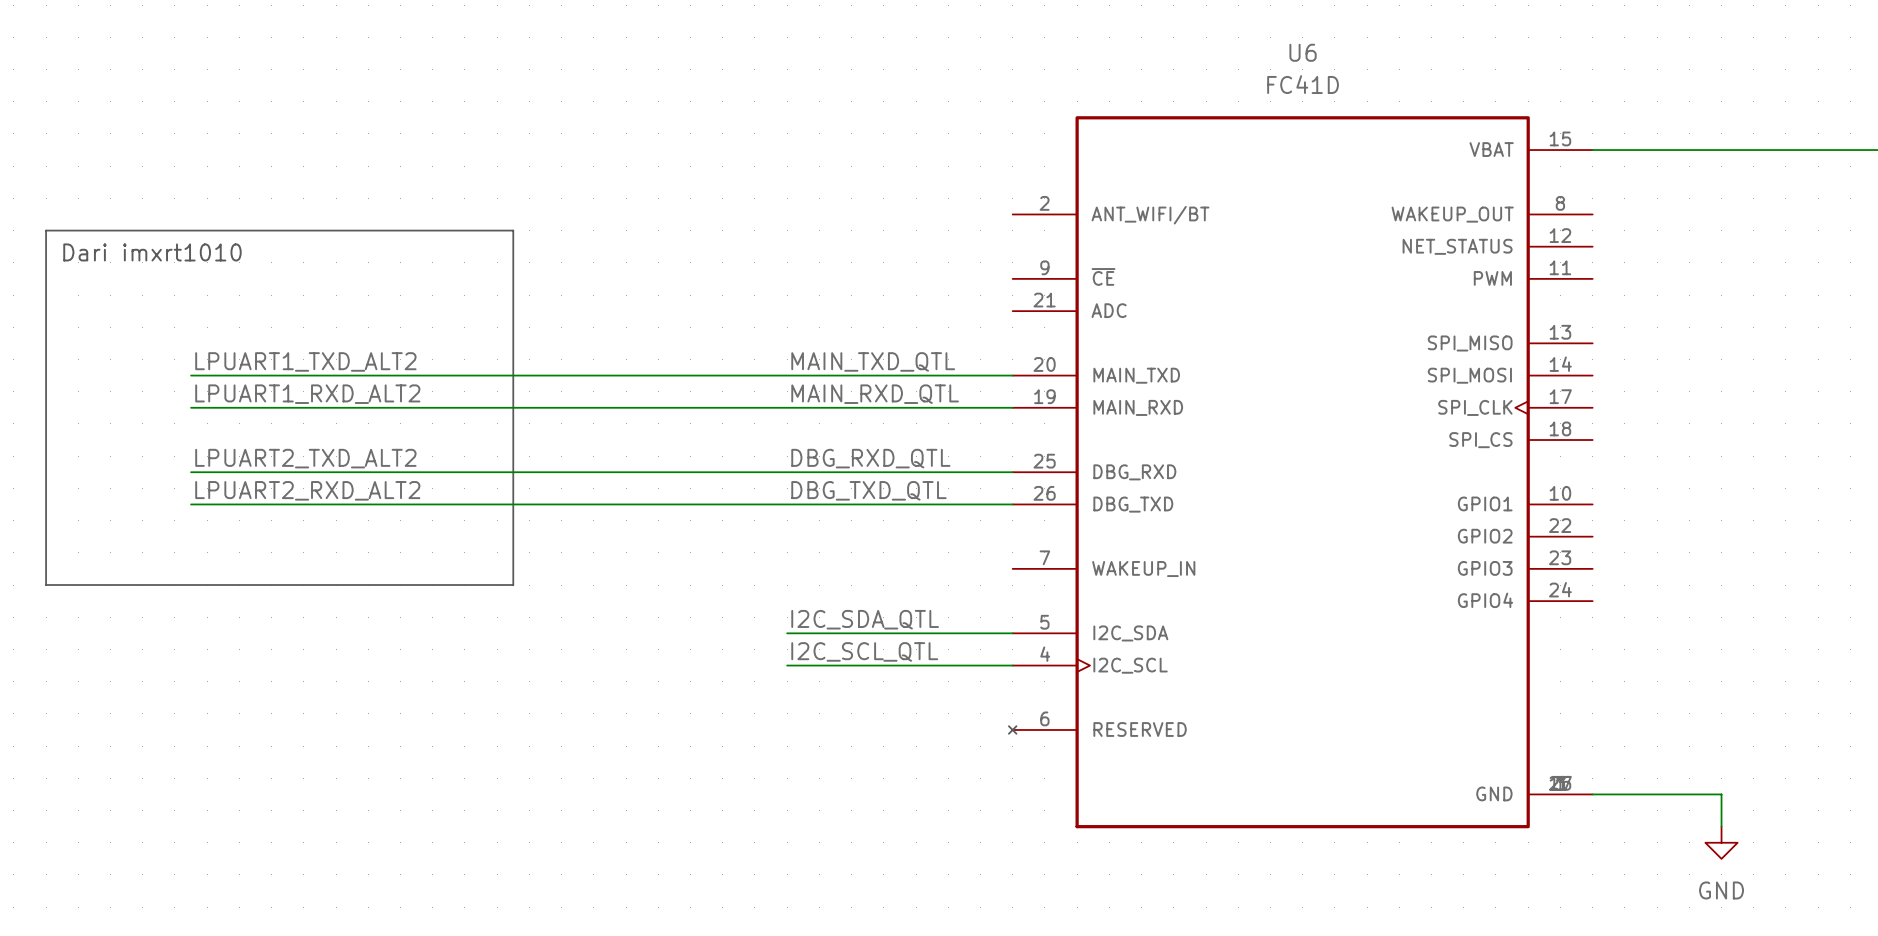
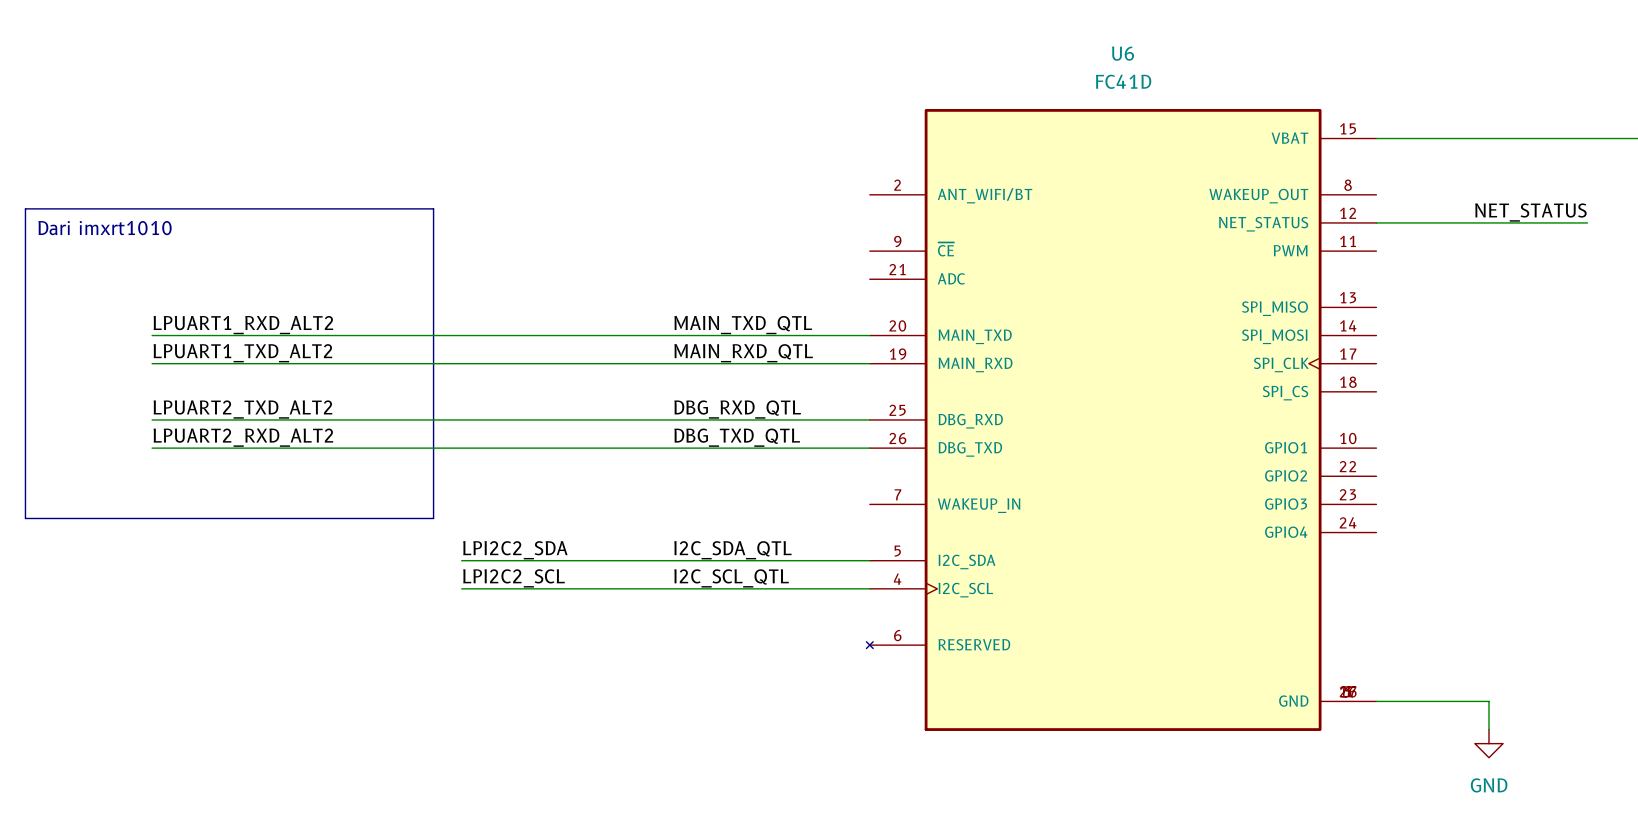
label: none -> NET_STATUS (1530, 212)
wire: none -> (1376, 222) (1587, 222)
label: LPUART1_TXD_ALT2 (305, 361) -> LPUART1_RXD_ALT2 (243, 325)
label: LPUART1_RXD_ALT2 (307, 394) -> LPUART1_TXD_ALT2 (242, 353)
label: none -> LPI2C2_SDA (515, 550)
wire: none -> (461, 560) (672, 560)
label: none -> LPI2C2_SCL (514, 578)
wire: none -> (461, 588) (672, 588)

